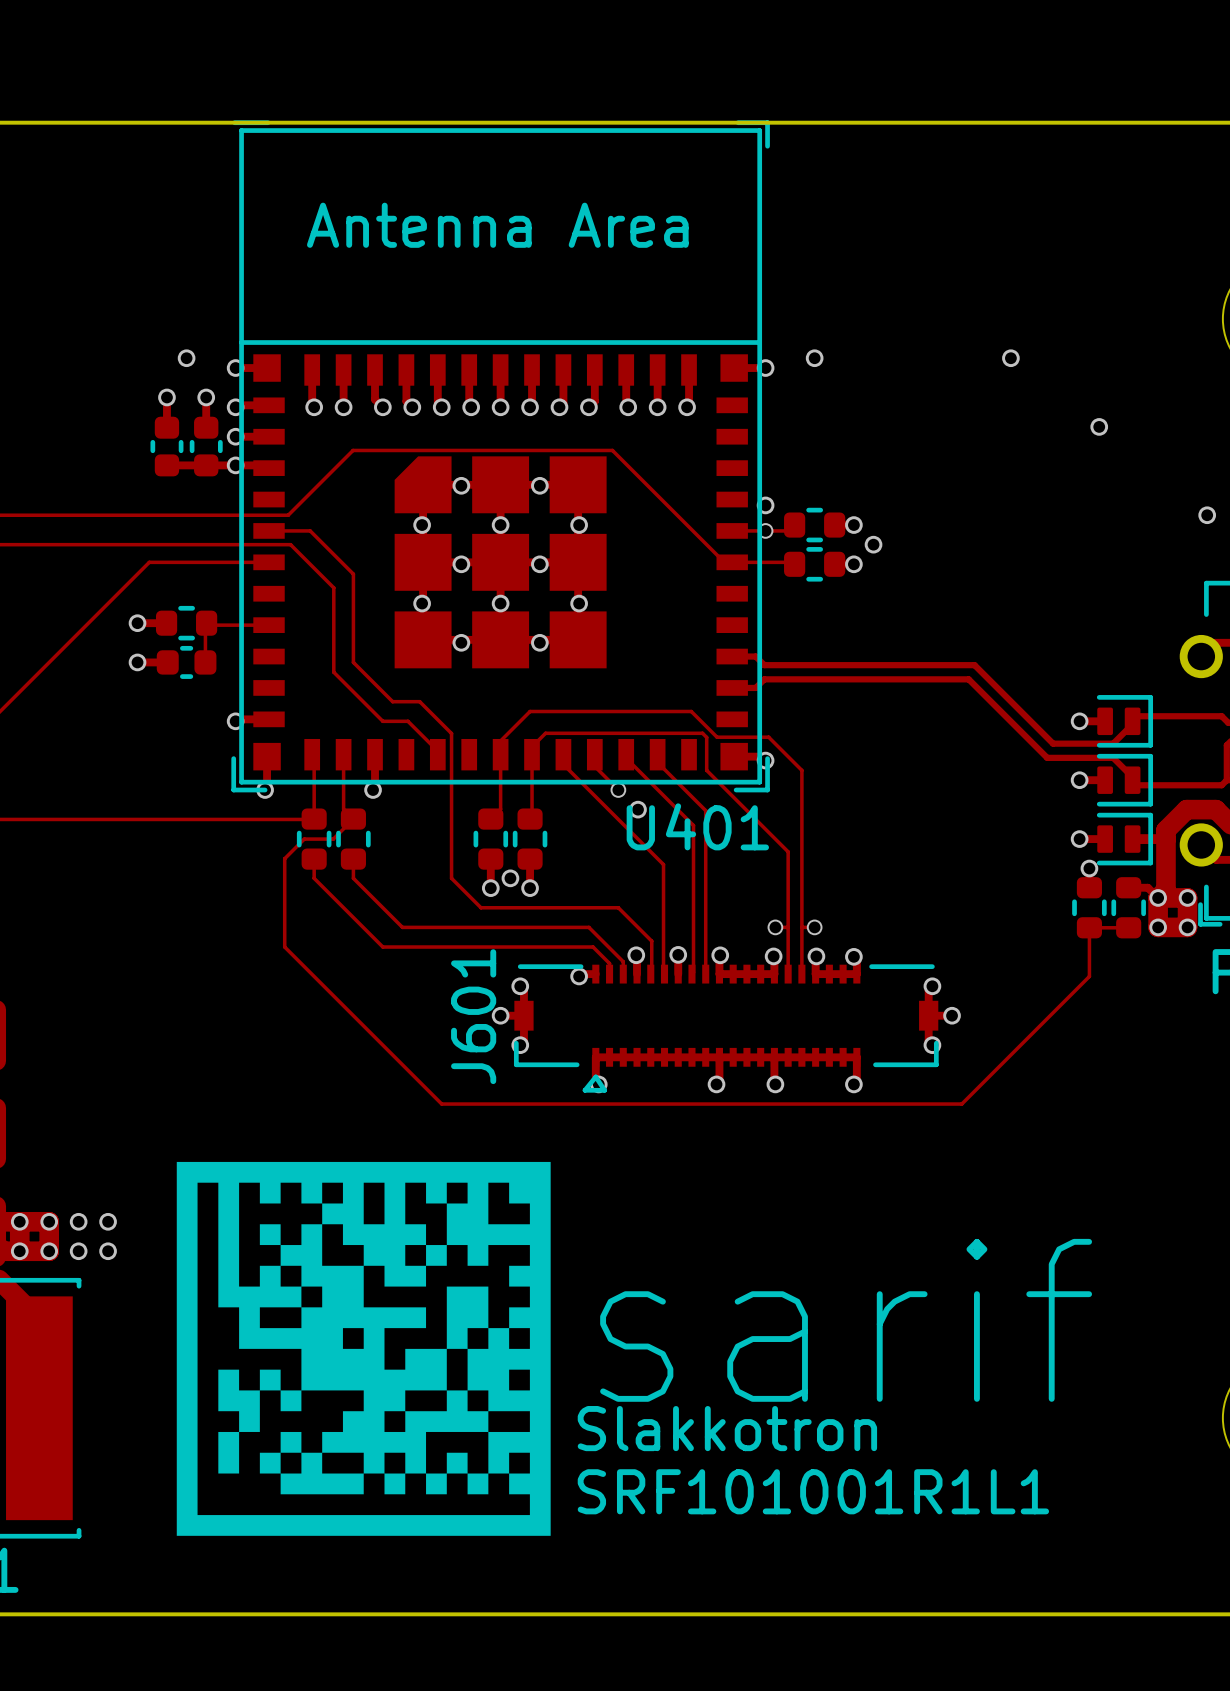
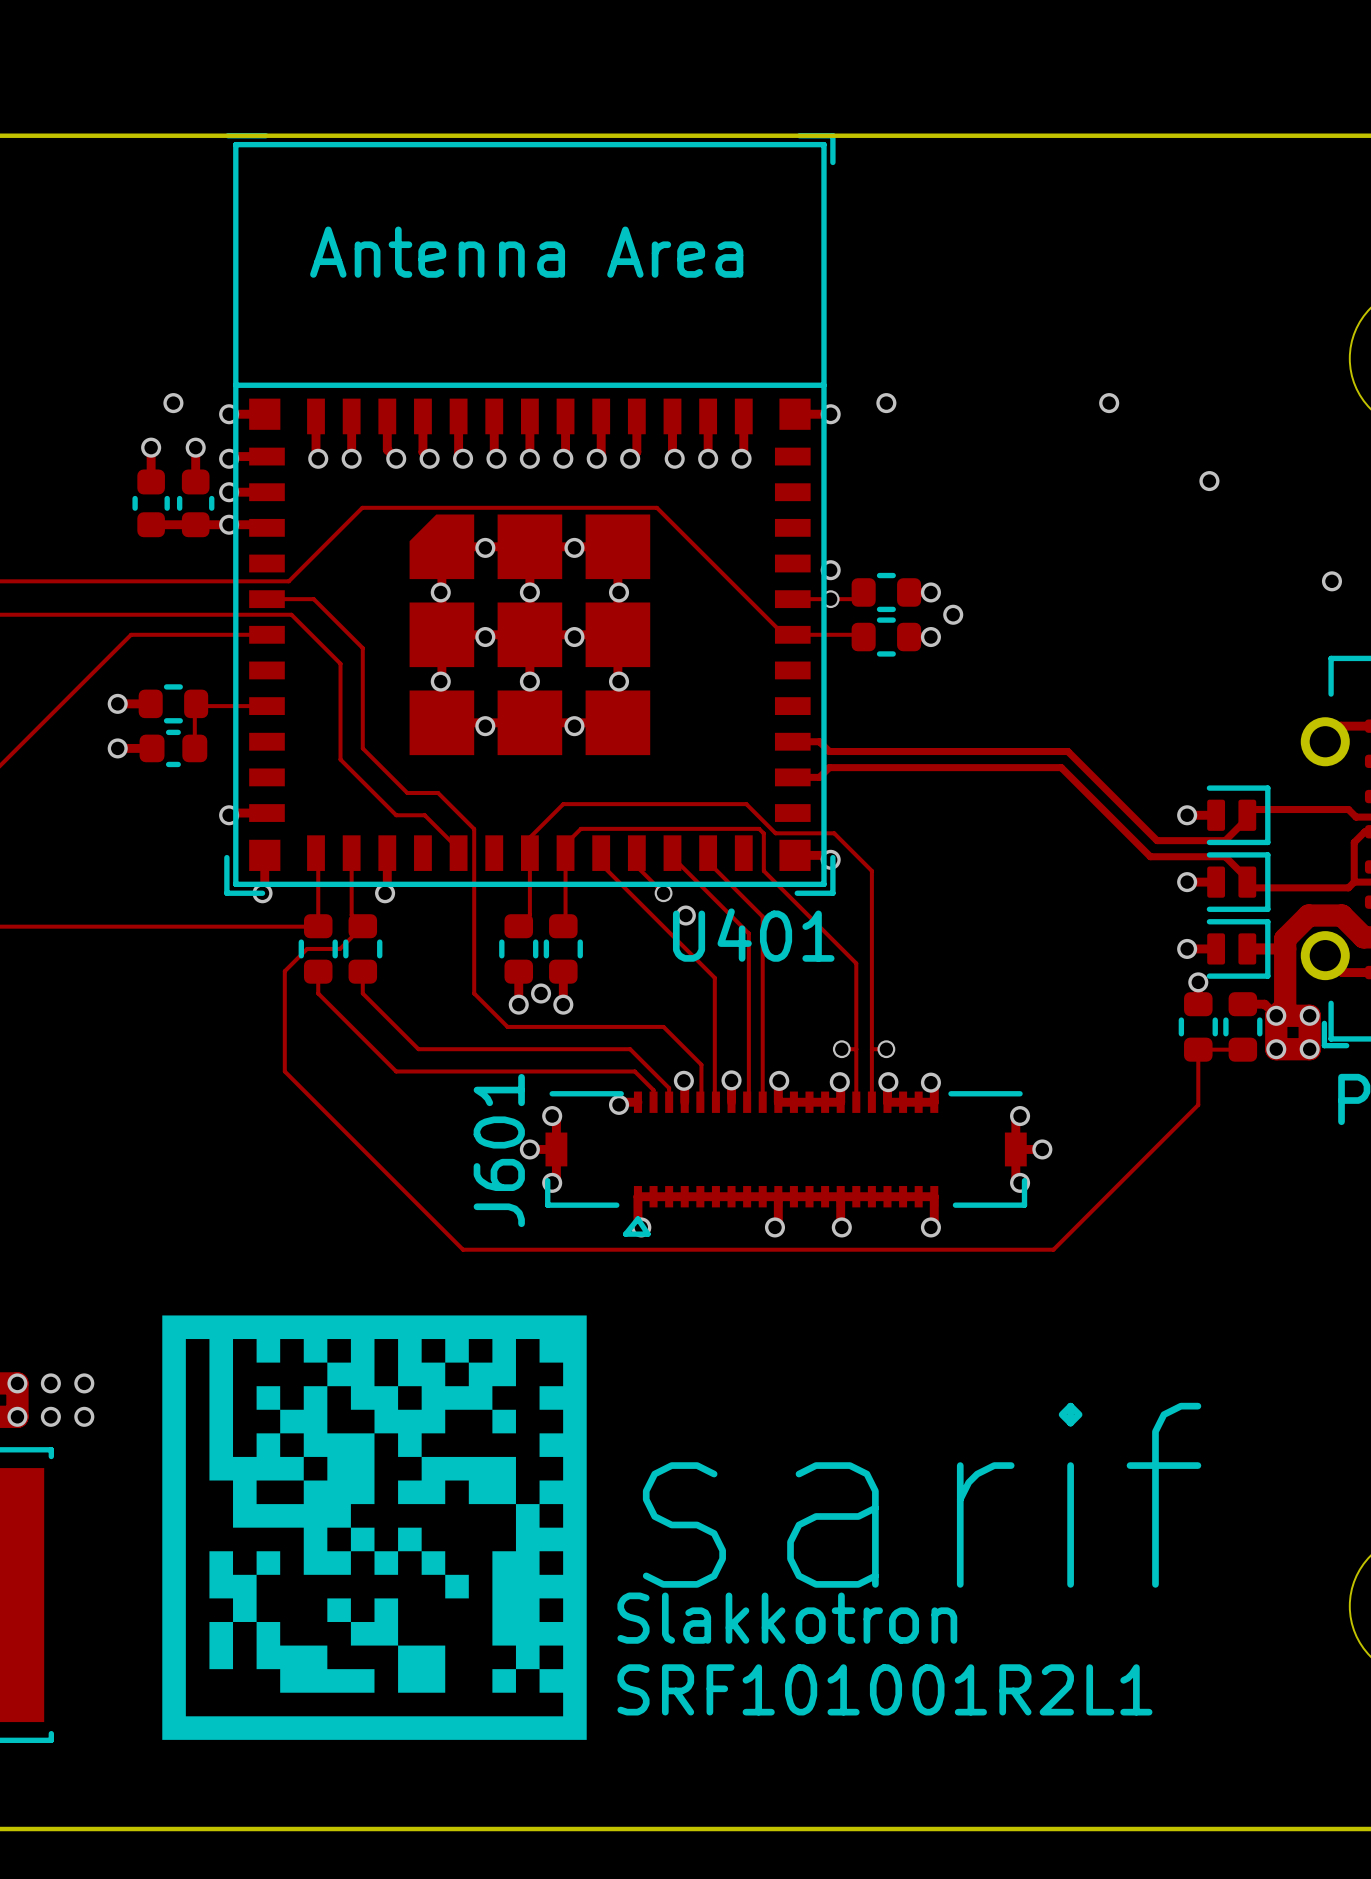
drawing shape: [176, 1161, 551, 1536] -> [162, 1315, 587, 1740]
drawing: none -> [492, 1409, 516, 1434]
drawing shape: [446, 1286, 489, 1349] -> [398, 1456, 516, 1505]
drawing: none -> [256, 1527, 469, 1693]
drawing: [259, 1390, 364, 1495] -> none
drawing: [426, 1452, 468, 1495] -> none
drawing shape: [384, 1473, 406, 1495] -> [398, 1645, 446, 1693]
text: SRF101001R1L1 (813, 1491) -> SRF101001R2L1 (884, 1689)

